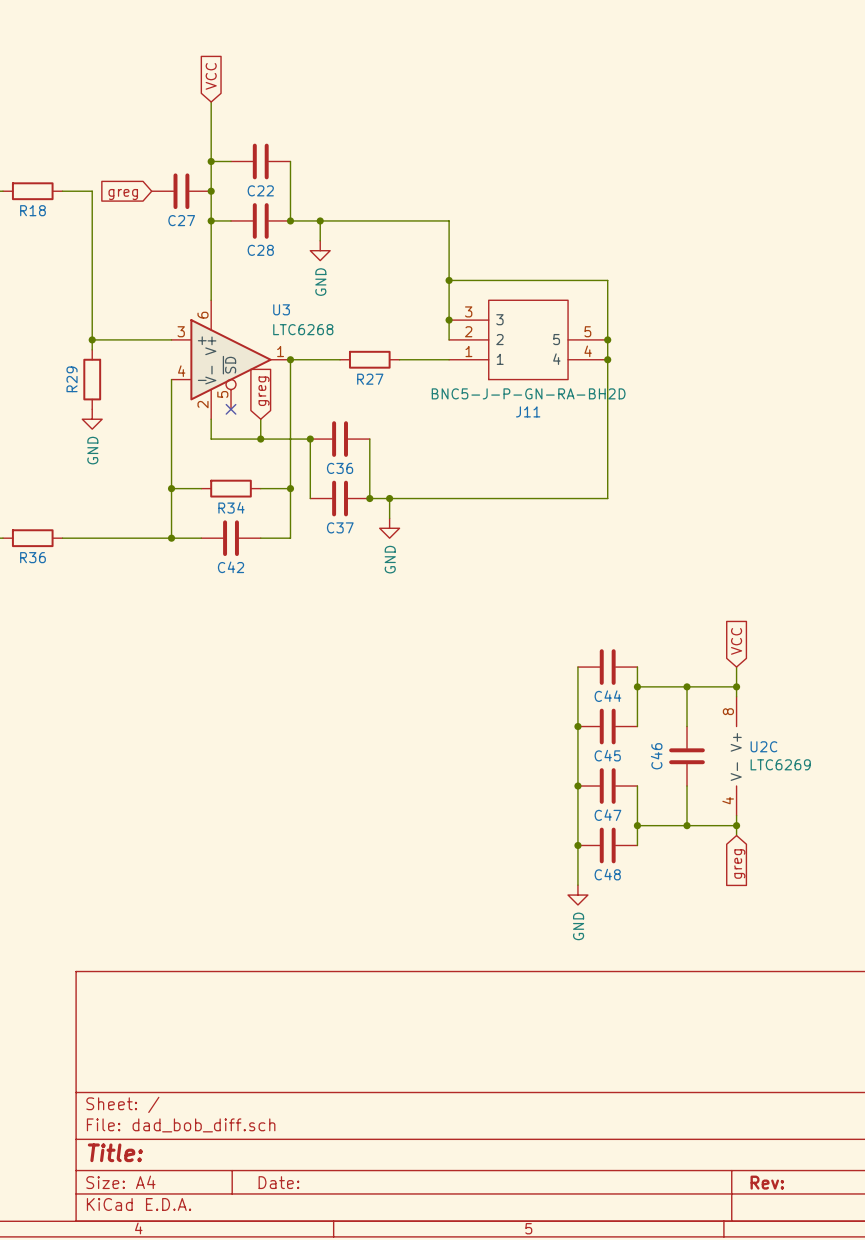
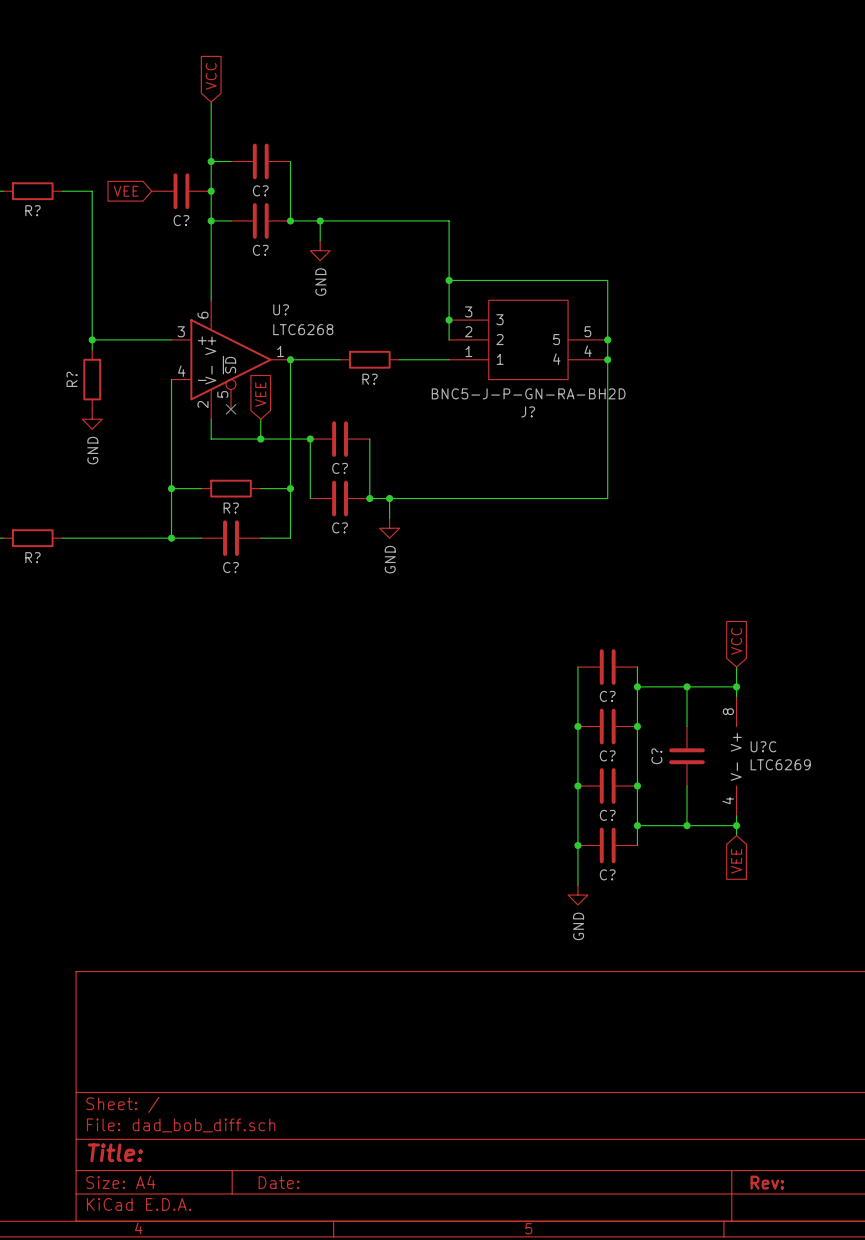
C22 name: C22 (260, 190) -> C? (260, 190)
global label: greg (123, 194) -> VEE (126, 191)
R18 name: R18 (32, 210) -> R? (32, 210)
C27 name: C27 (181, 220) -> C? (181, 220)
C28 name: C28 (260, 250) -> C? (260, 250)
U3 name: U3 (281, 309) -> U? (281, 309)
R29 name: R29 (72, 379) -> R? (72, 379)
R27 name: R27 (370, 379) -> R? (370, 379)
global label: greg (264, 391) -> VEE (260, 394)
J11 name: J11 (528, 411) -> J? (528, 411)
C36 name: C36 (340, 468) -> C? (340, 468)
R34 name: R34 (231, 507) -> R? (231, 508)
C37 name: C37 (340, 527) -> C? (340, 527)
R36 name: R36 (32, 557) -> R? (32, 557)
C42 name: C42 (231, 567) -> C? (231, 567)
C44 name: C44 (607, 696) -> C? (607, 696)
wire: none -> (637, 726) (637, 786)
junction: none -> (637, 726)
U2C name: U2C (763, 746) -> U?C (763, 746)
C45 name: C45 (607, 755) -> C? (607, 755)
C46 name: C46 (656, 756) -> C? (656, 756)
junction: none -> (637, 786)
C47 name: C47 (607, 815) -> C? (607, 815)
global label: greg (739, 864) -> VEE (736, 861)
C48 name: C48 (607, 874) -> C? (607, 874)

